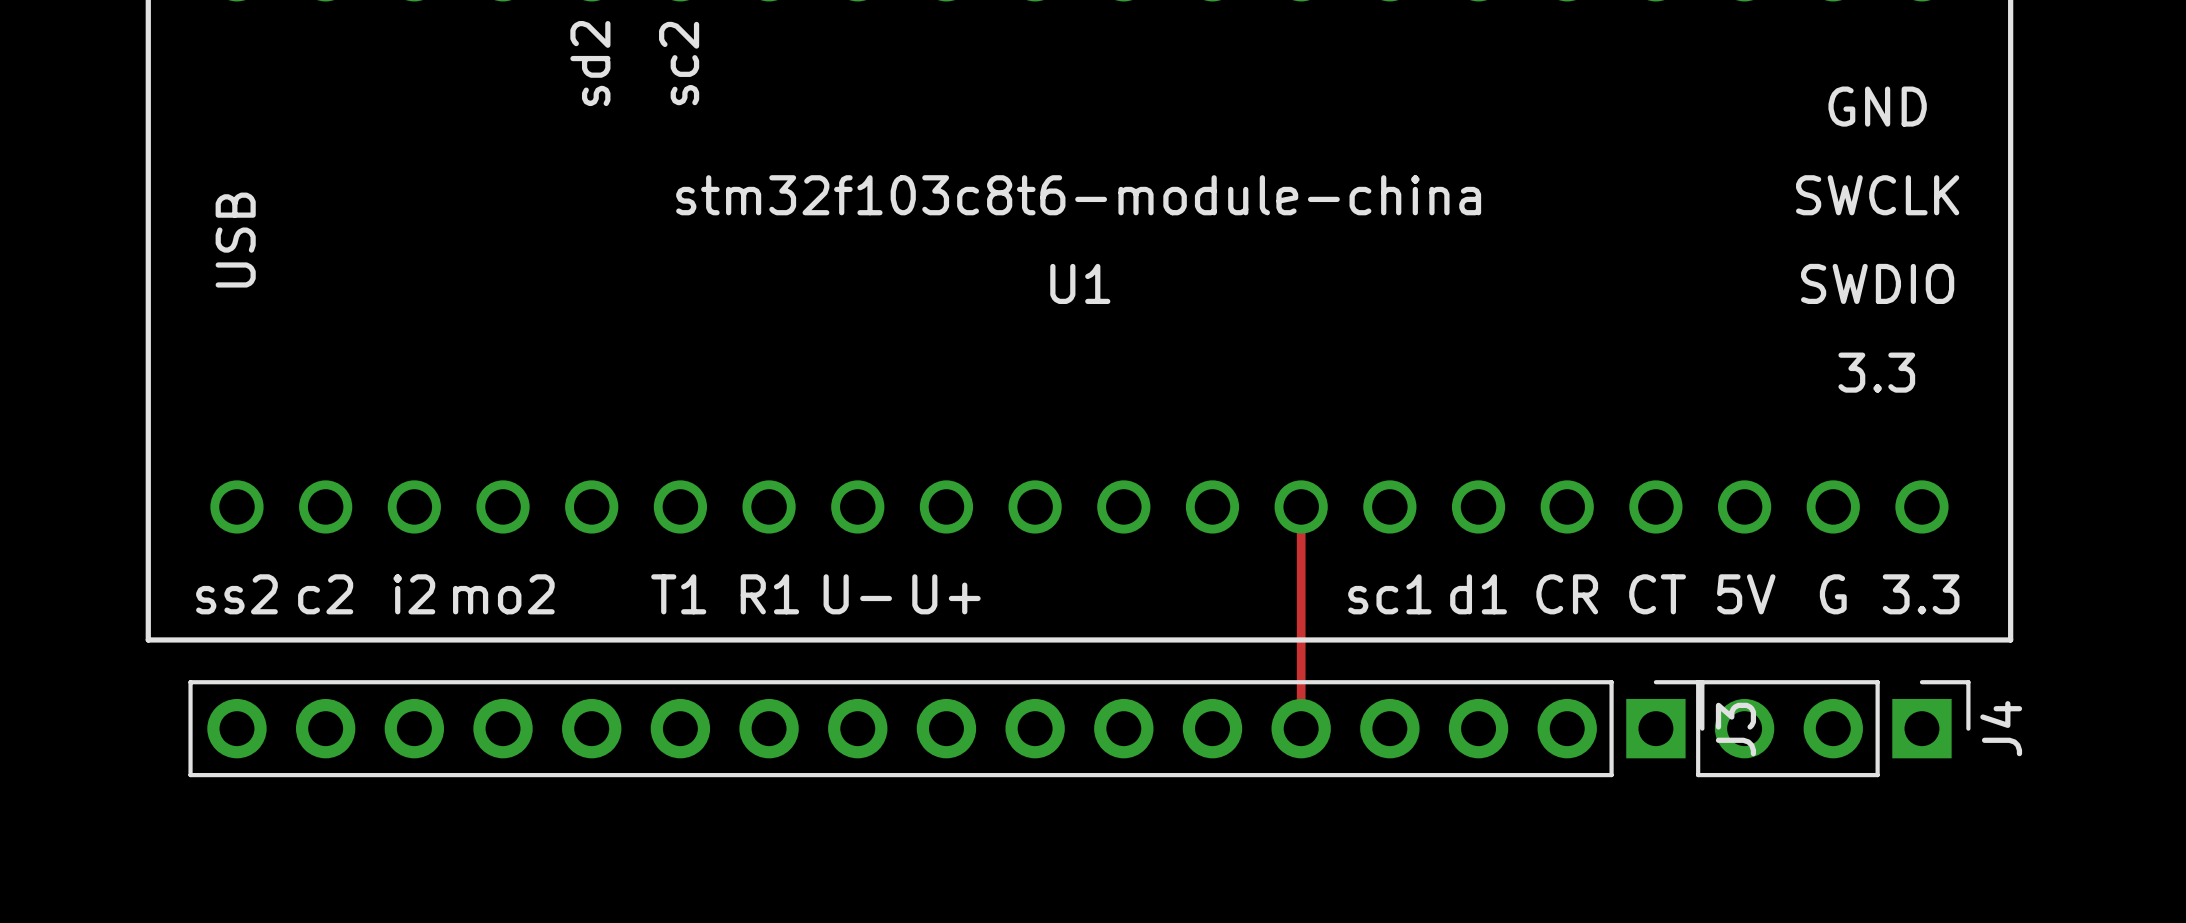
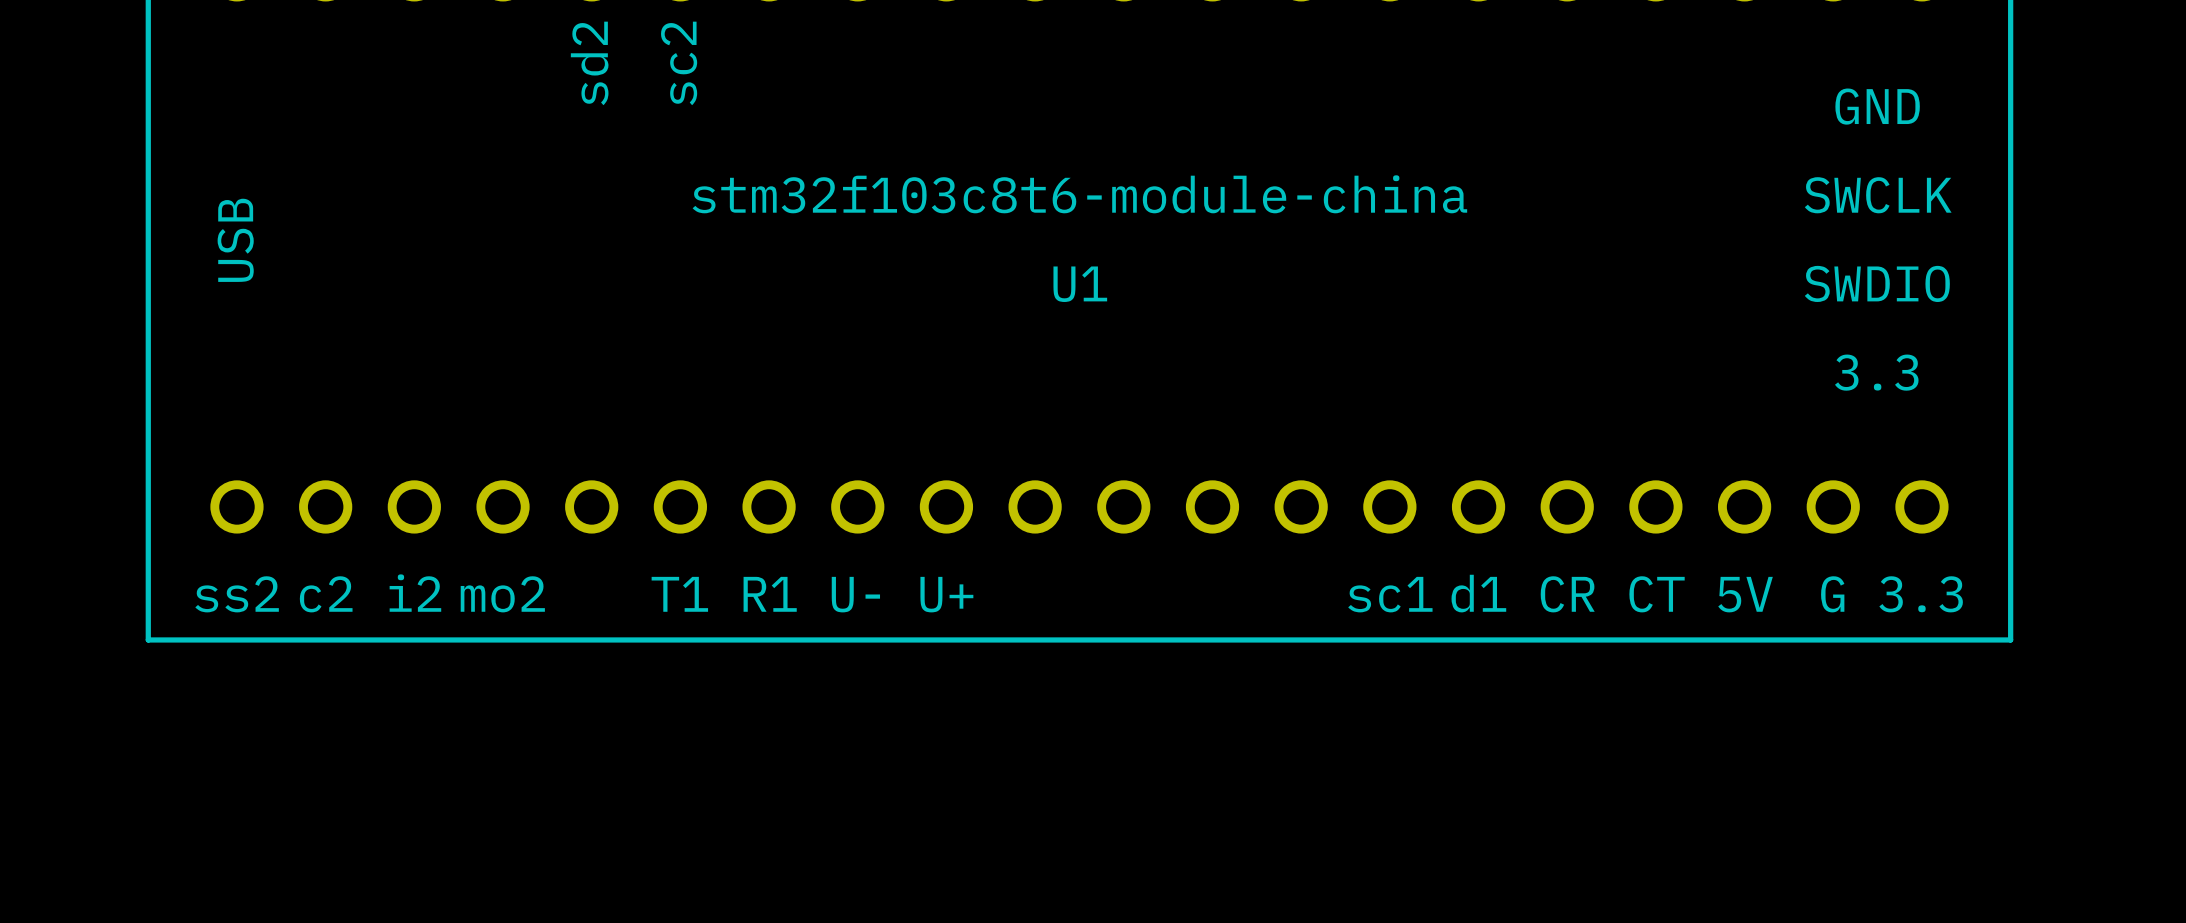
track: (1301, 506) (1301, 728) -> none
J3: (946, 728) -> none
J4: (1833, 728) -> none

